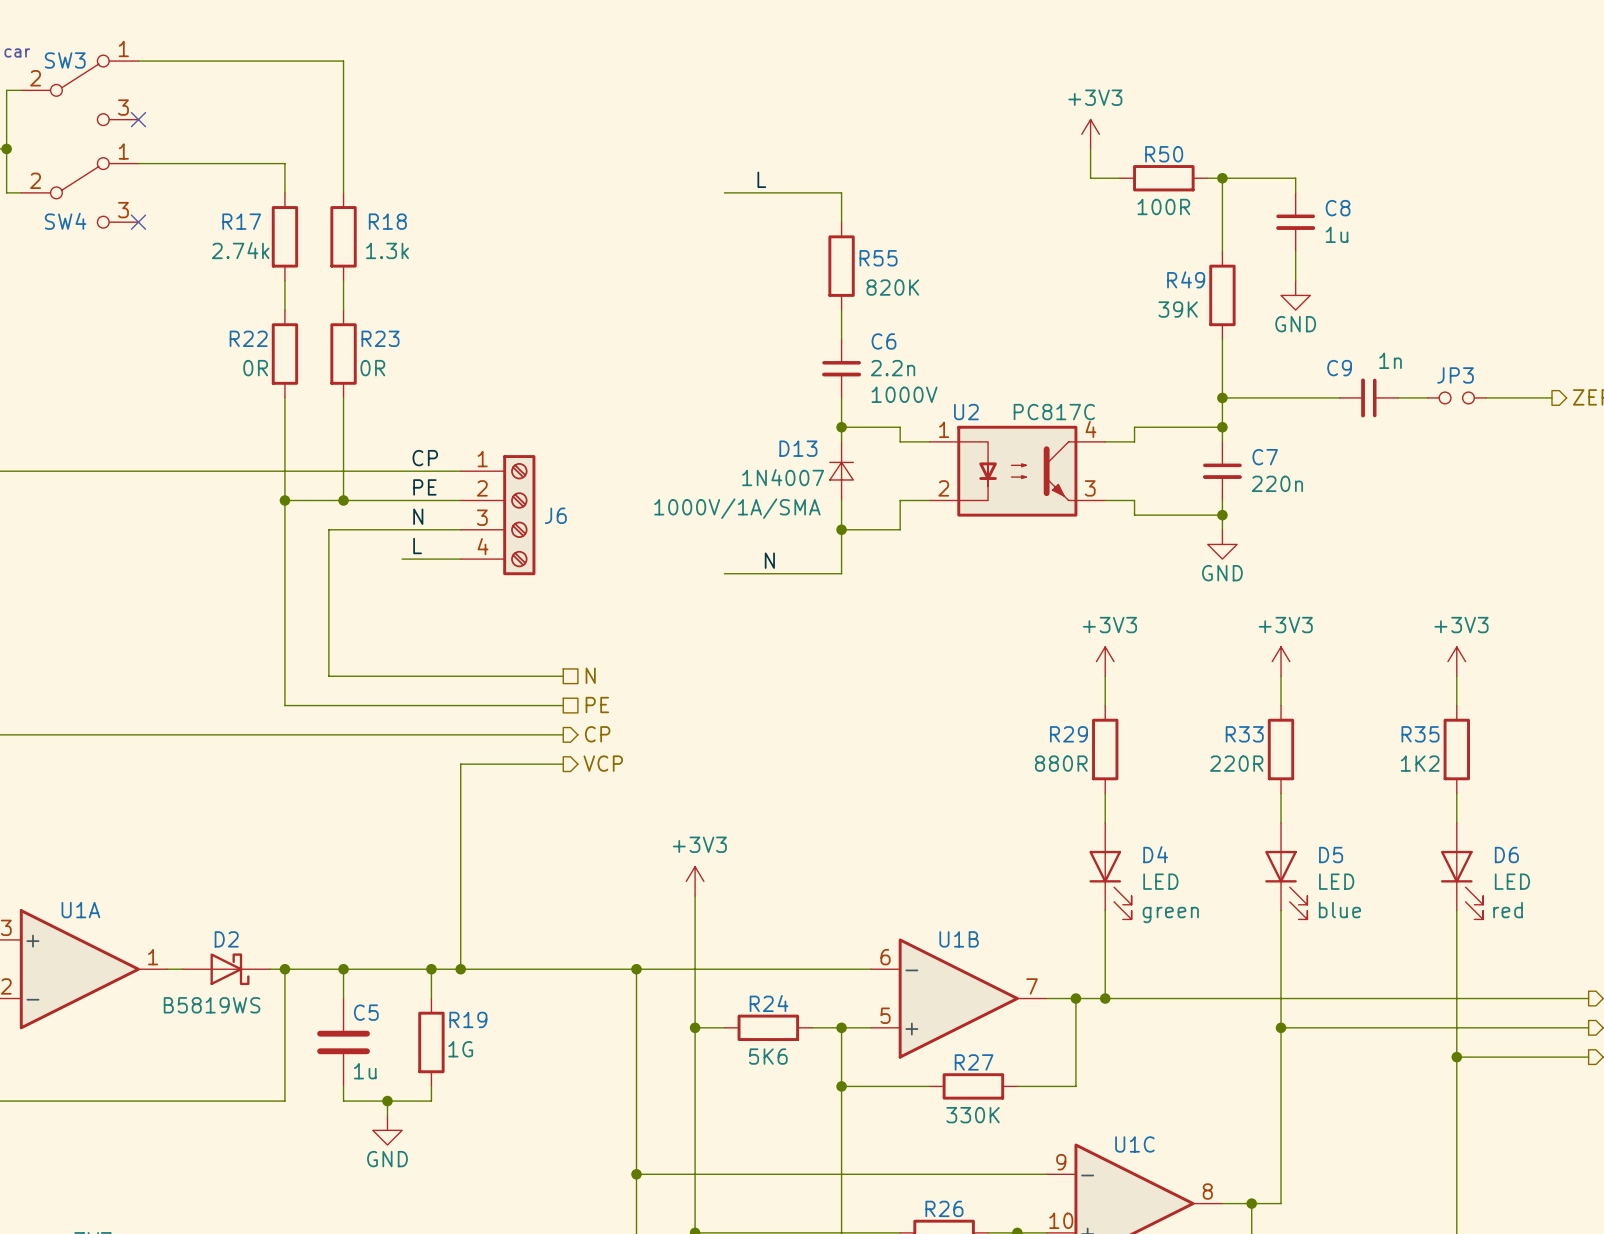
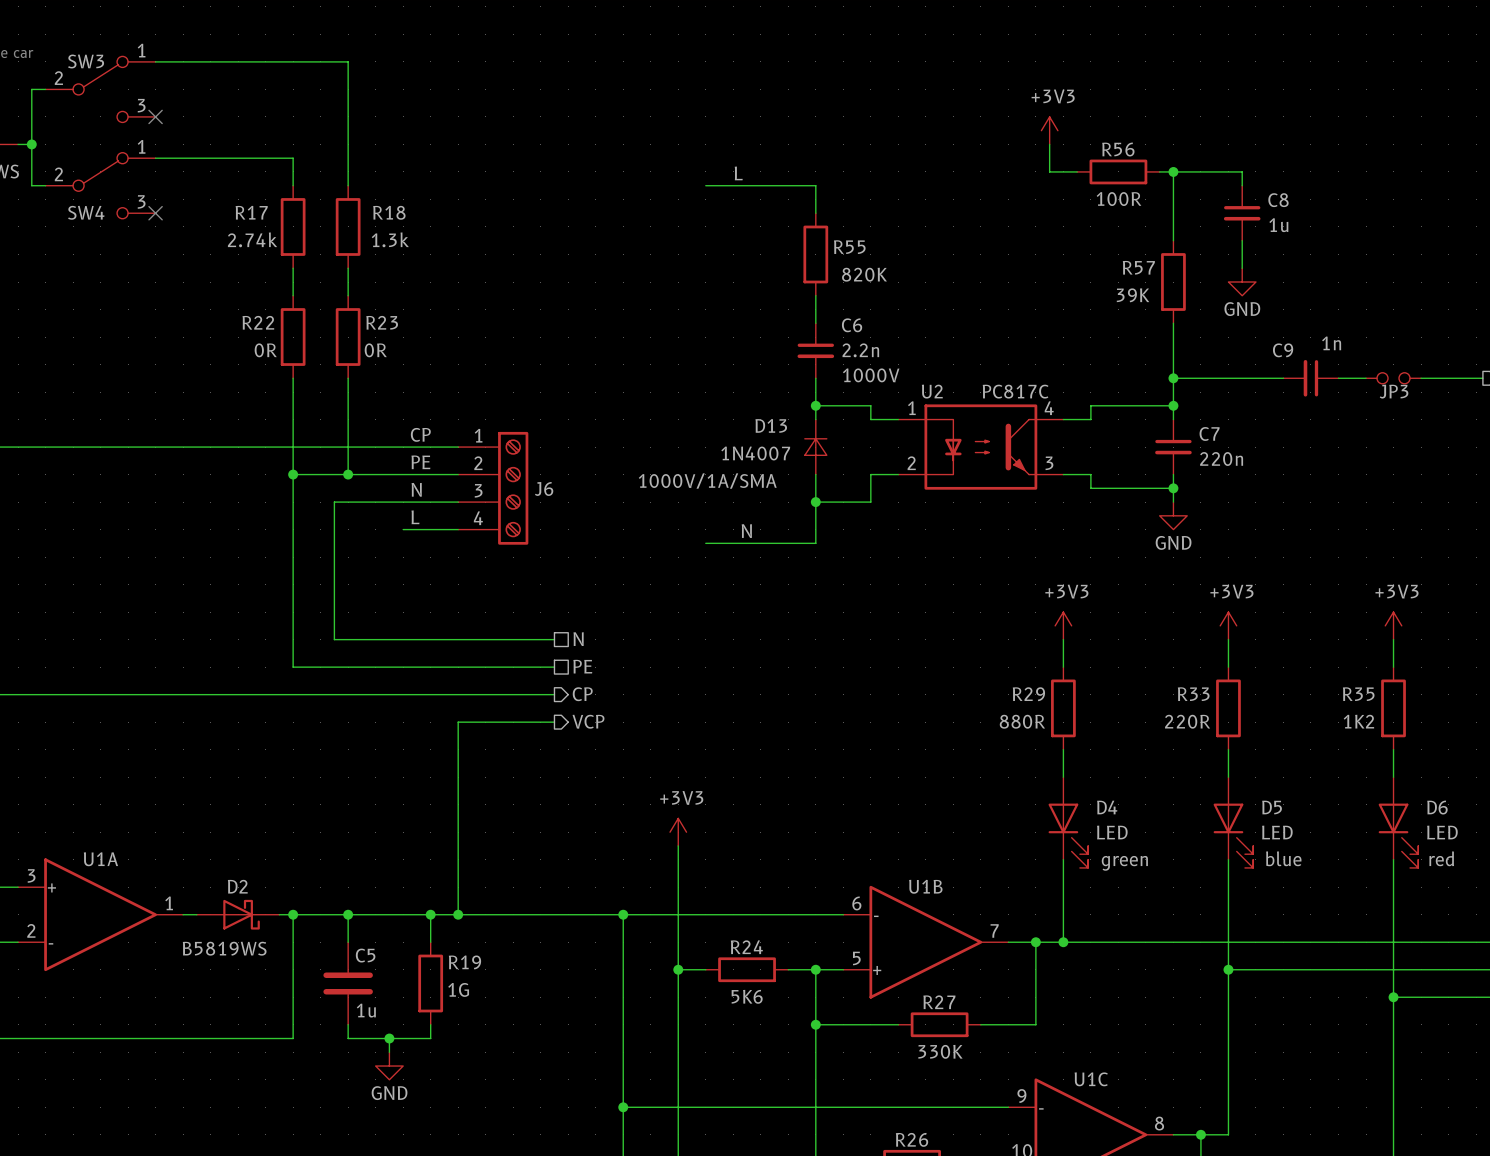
R50 name: R50 (1164, 154) -> R56 (1118, 149)
R49 name: R49 (1186, 279) -> R57 (1138, 267)
JP3 name position: JP3 (1455, 375) -> JP3 (1394, 391)

